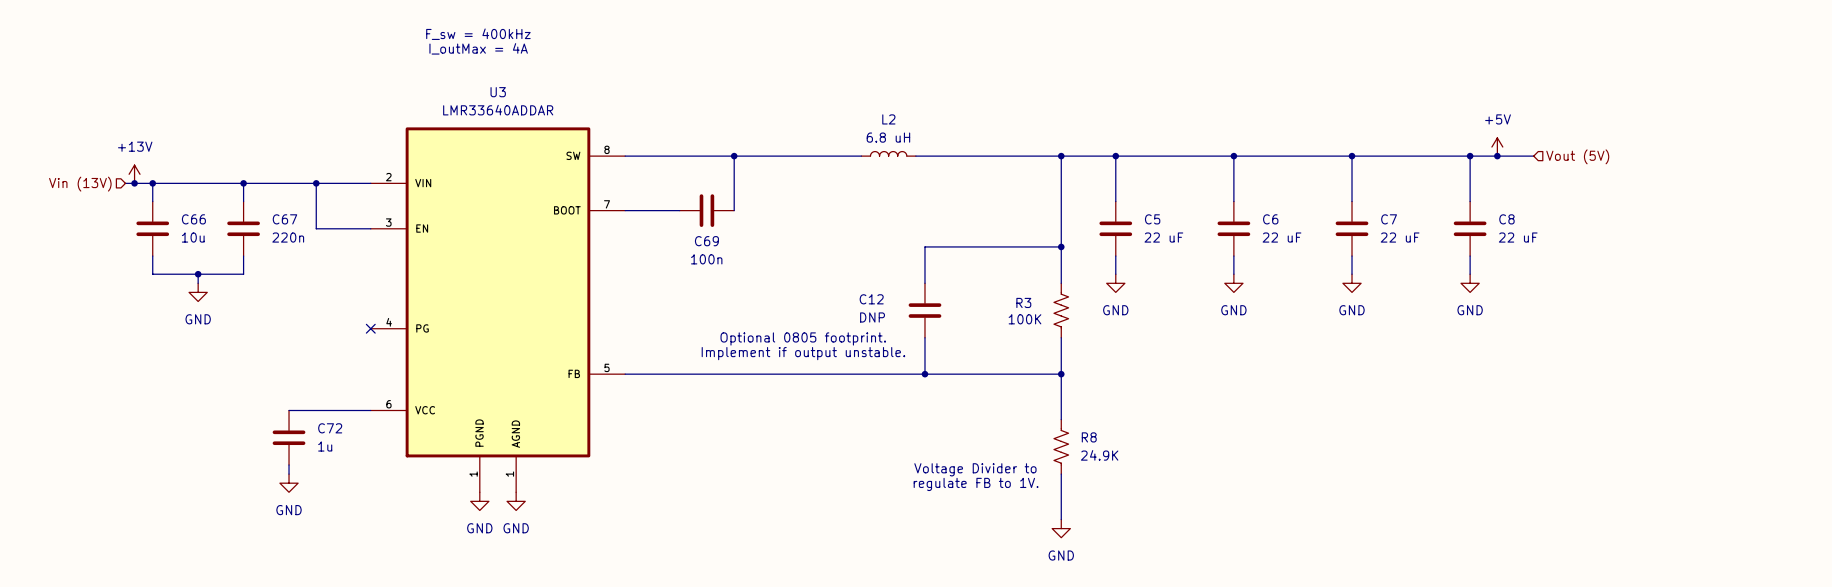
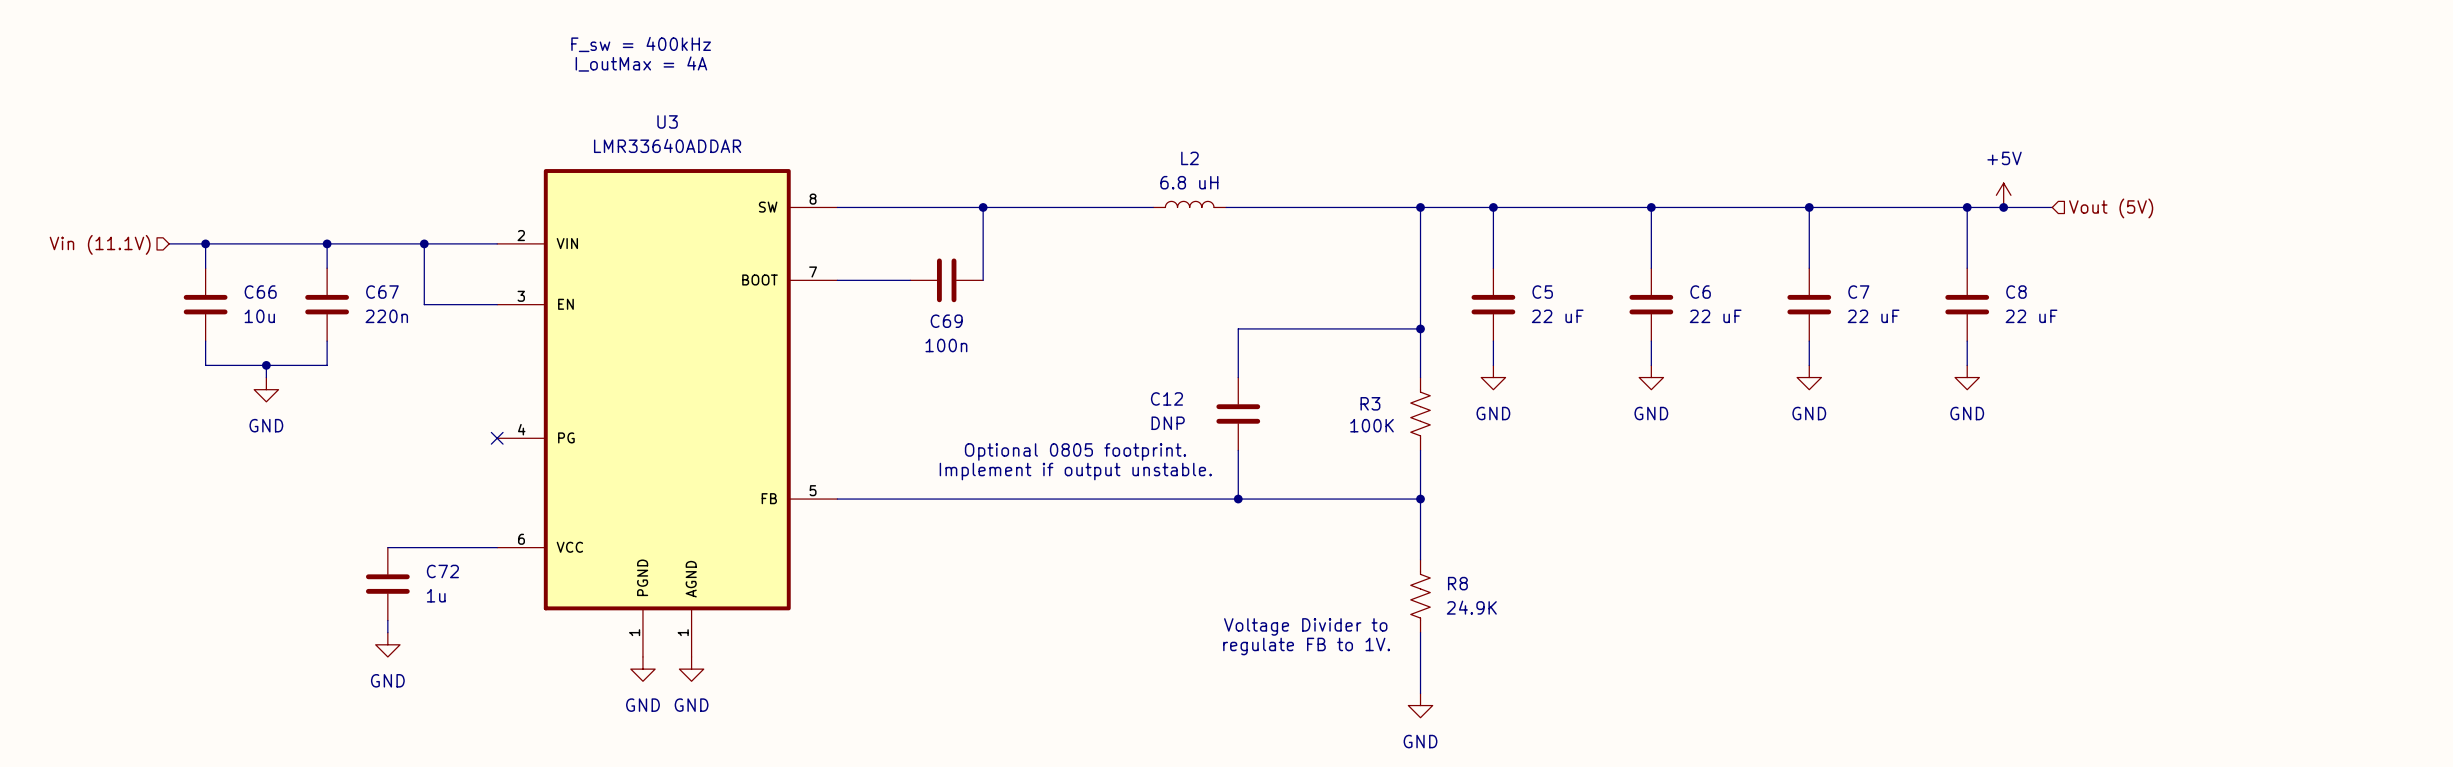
power symbol: +13V (134, 174) -> none
junction: (134, 183) -> none
hierarchical label: Vin (13V) (80, 184) -> Vin (11.1V) (100, 244)

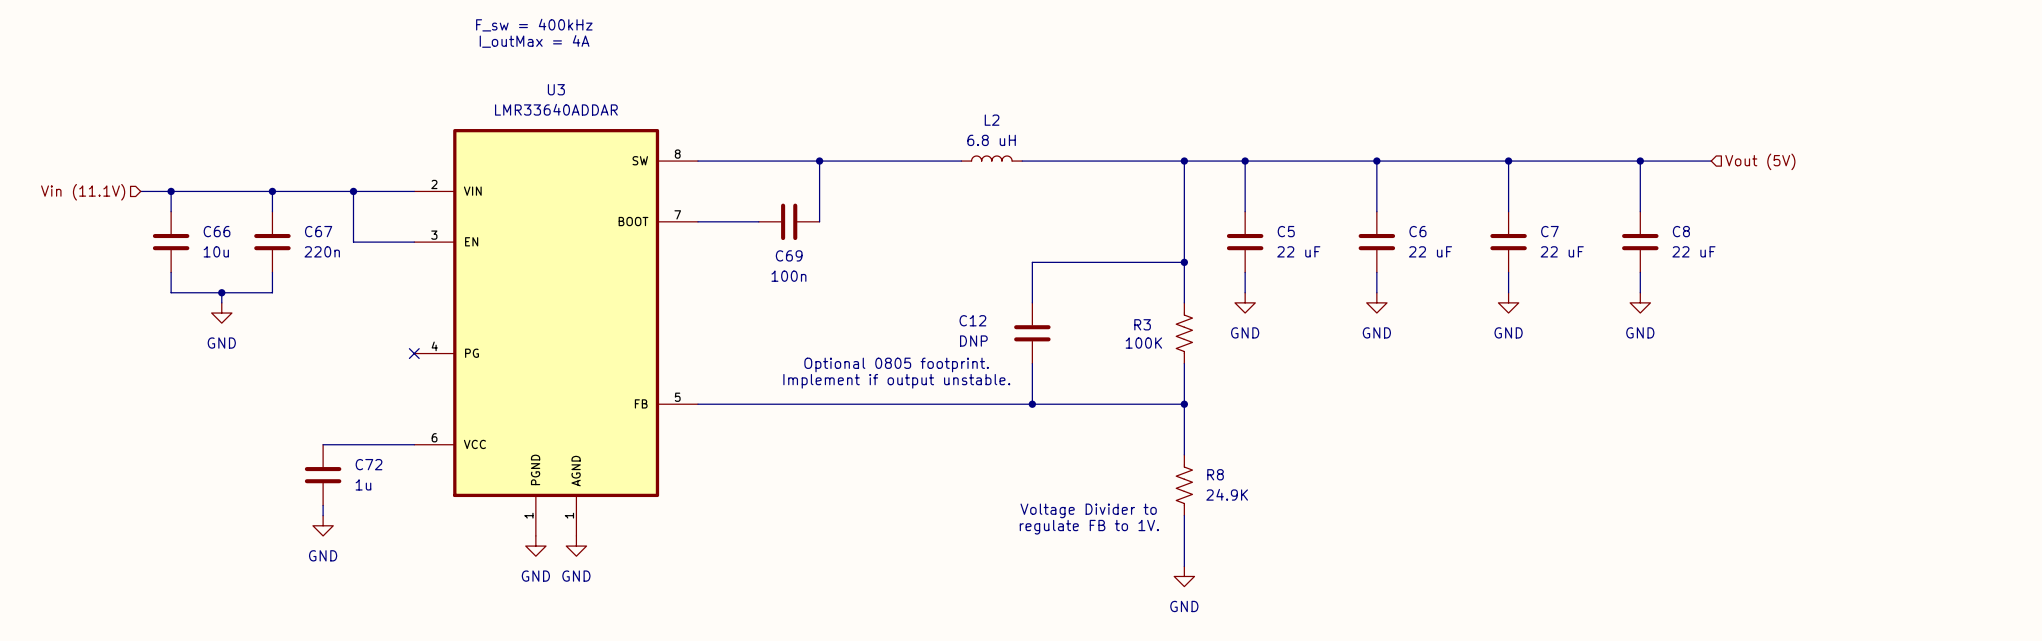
power symbol: +5V (2003, 195) -> none
junction: (2003, 207) -> none

